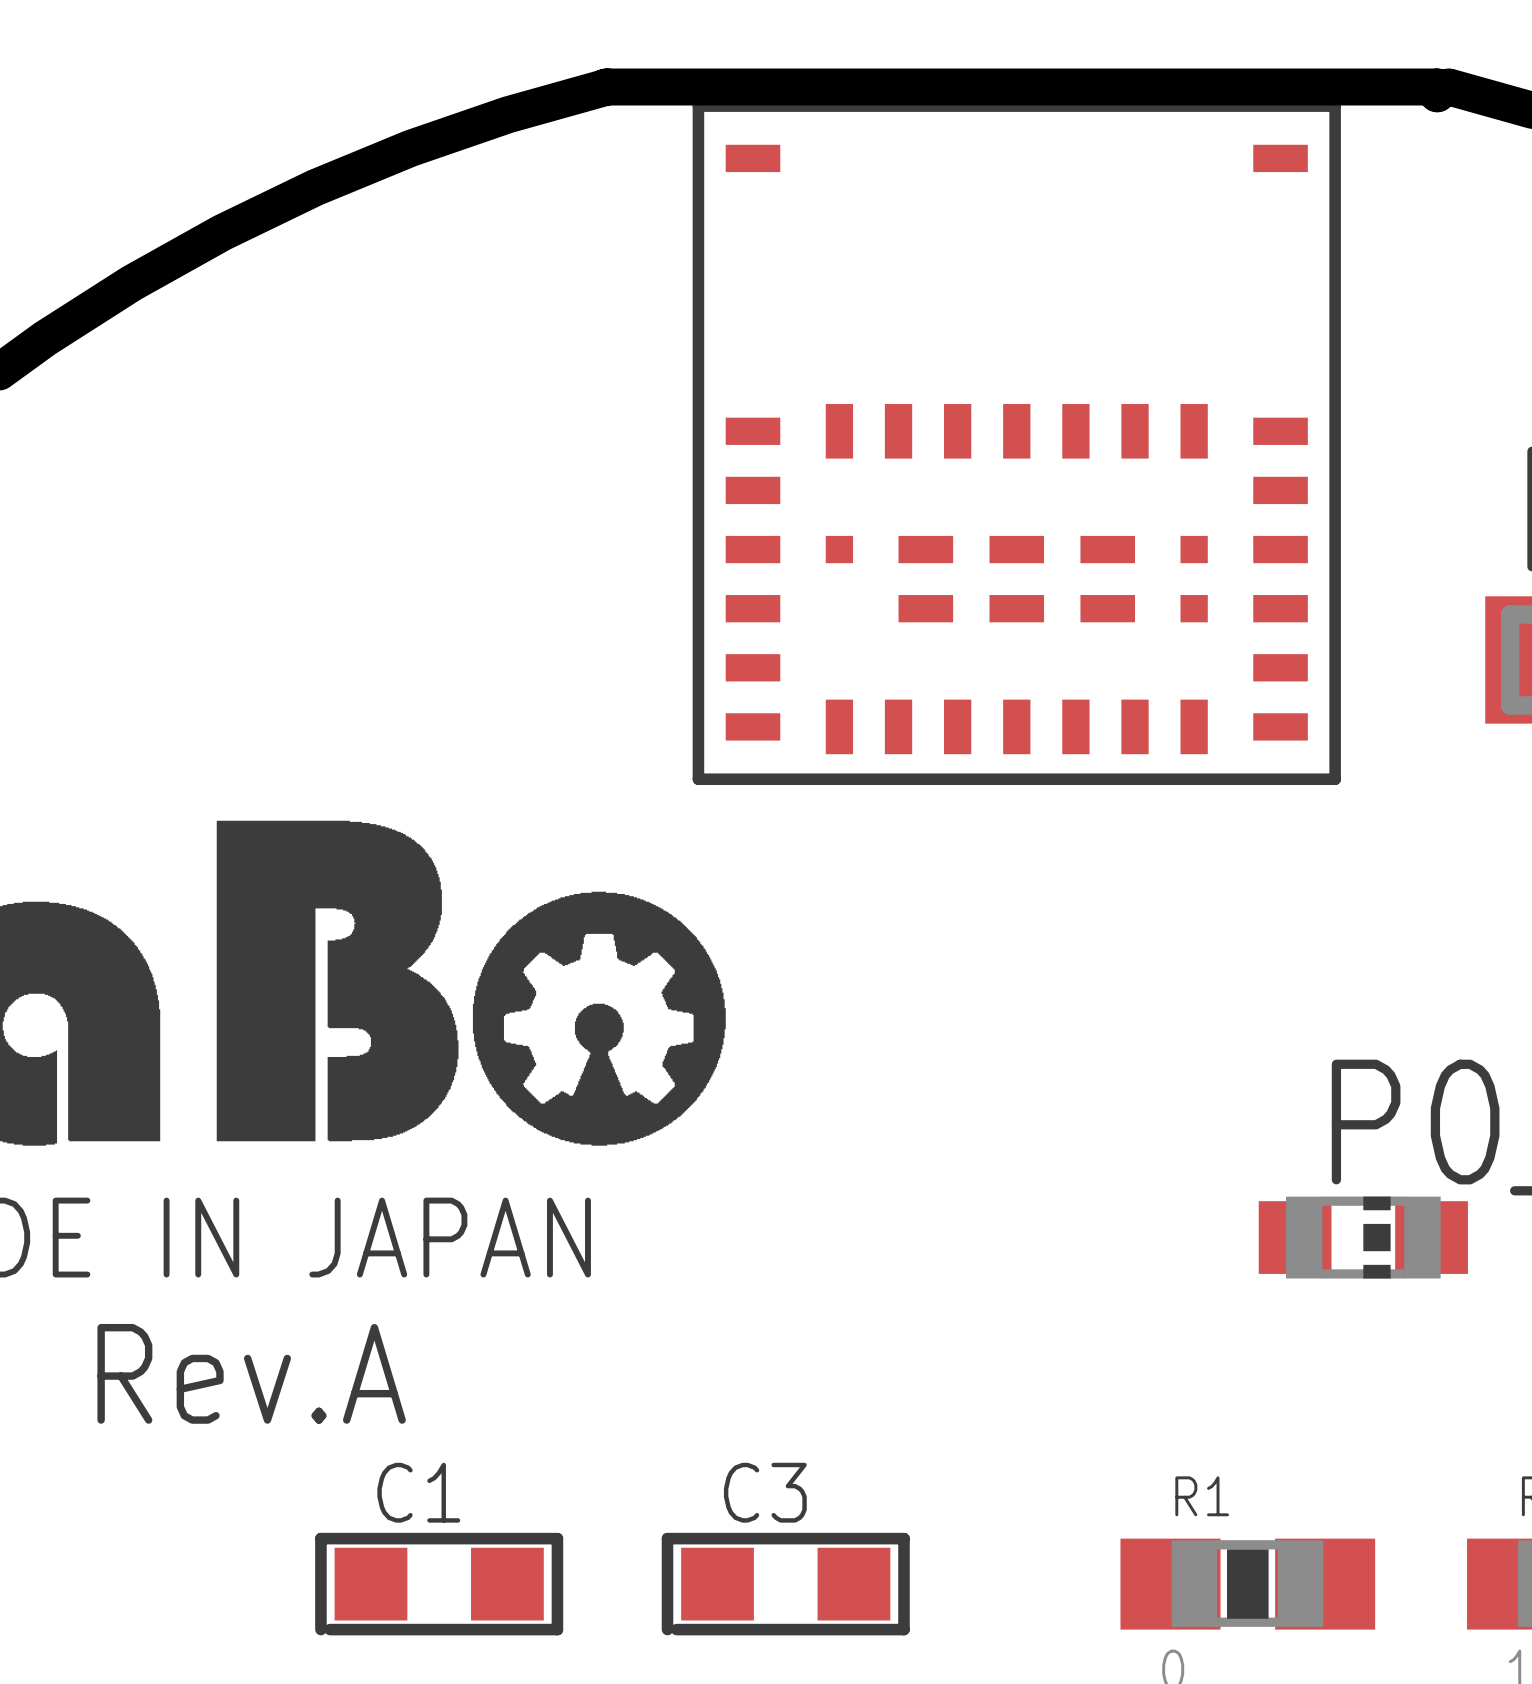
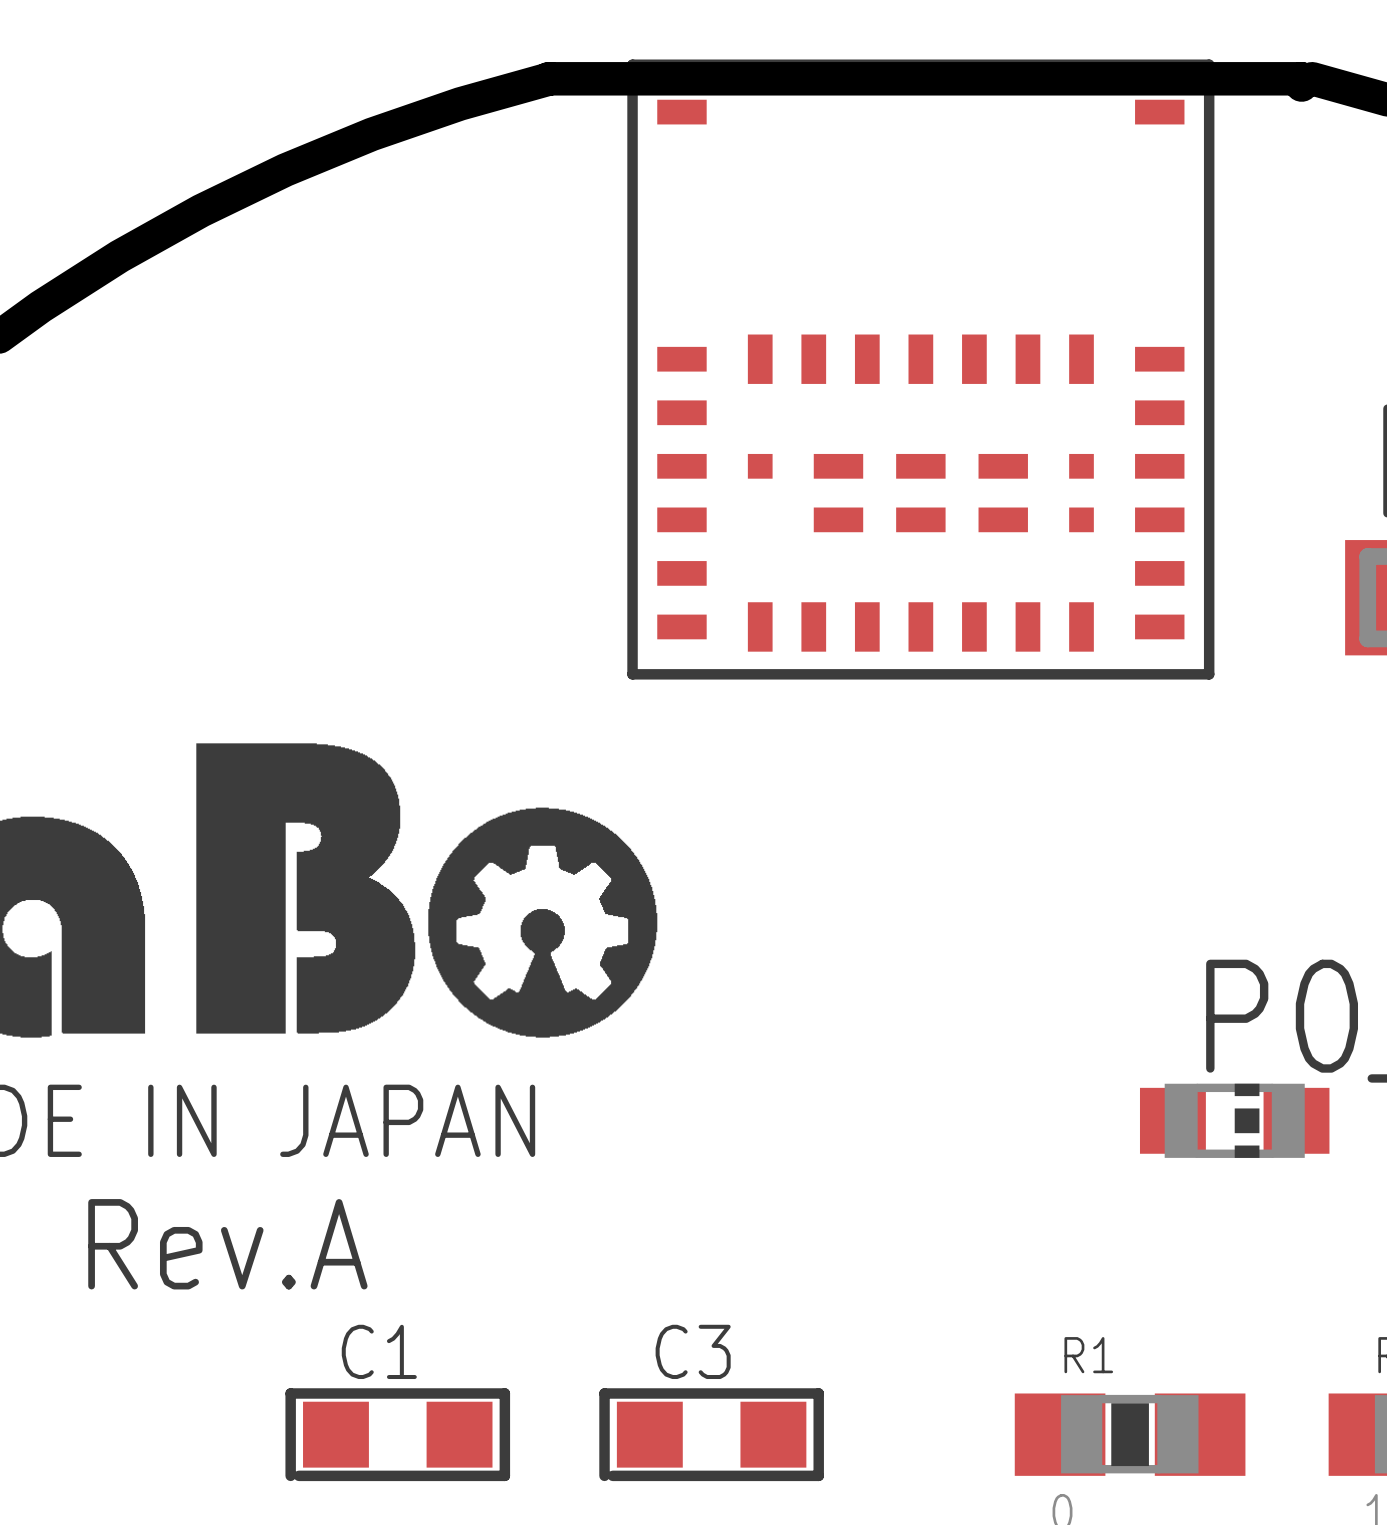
part position: (1016, 442) -> (920, 369)

